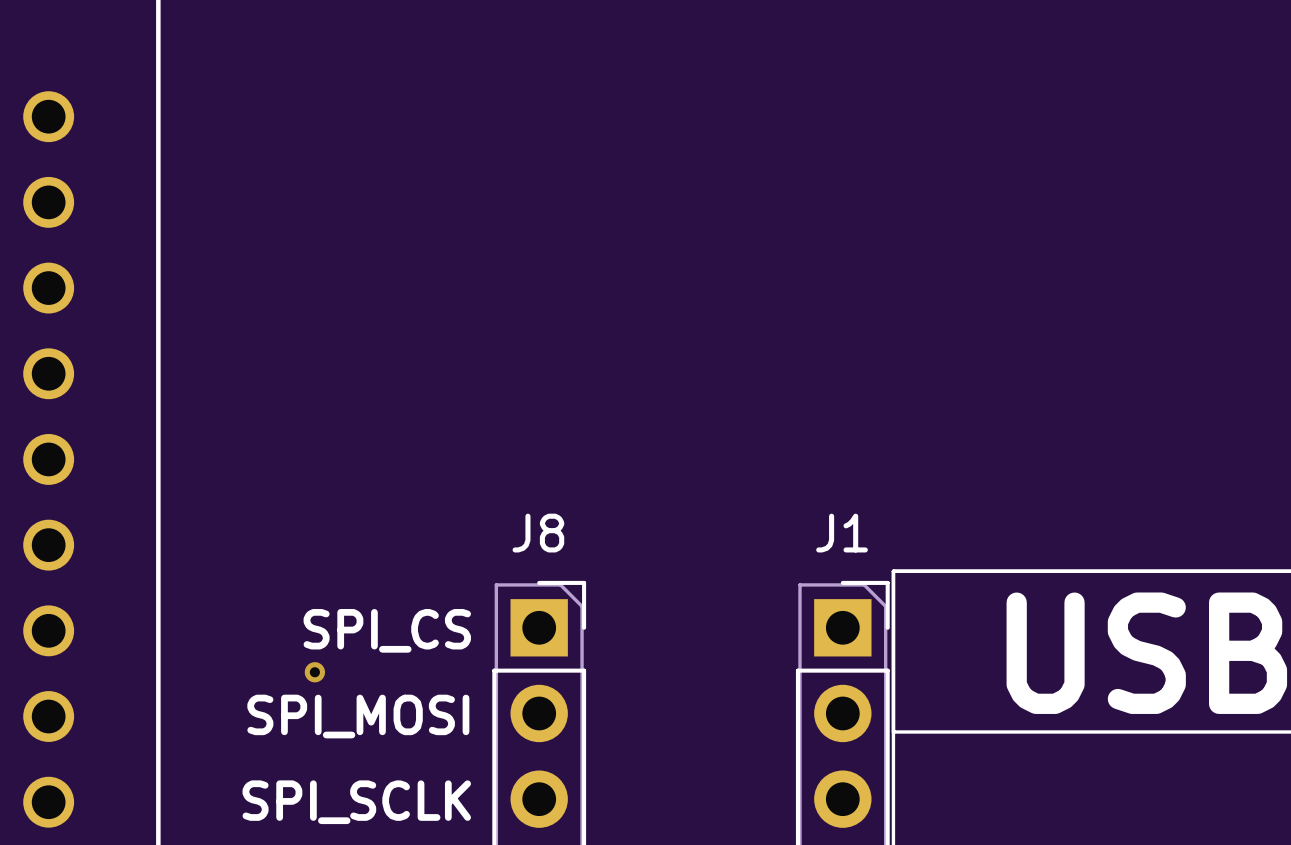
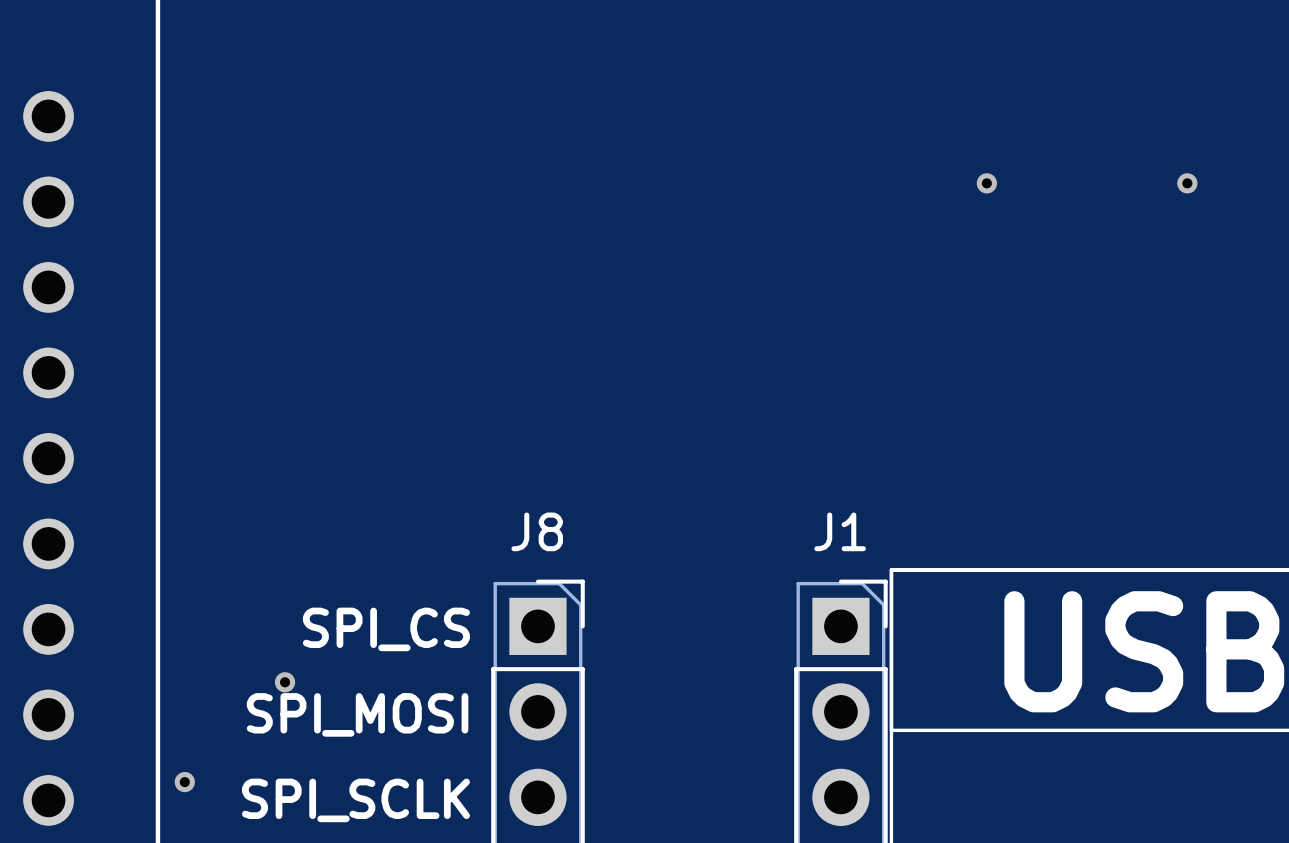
via: none -> (986, 183)
via: none -> (1187, 183)
via position: (314, 672) -> (285, 682)
via: none -> (184, 782)

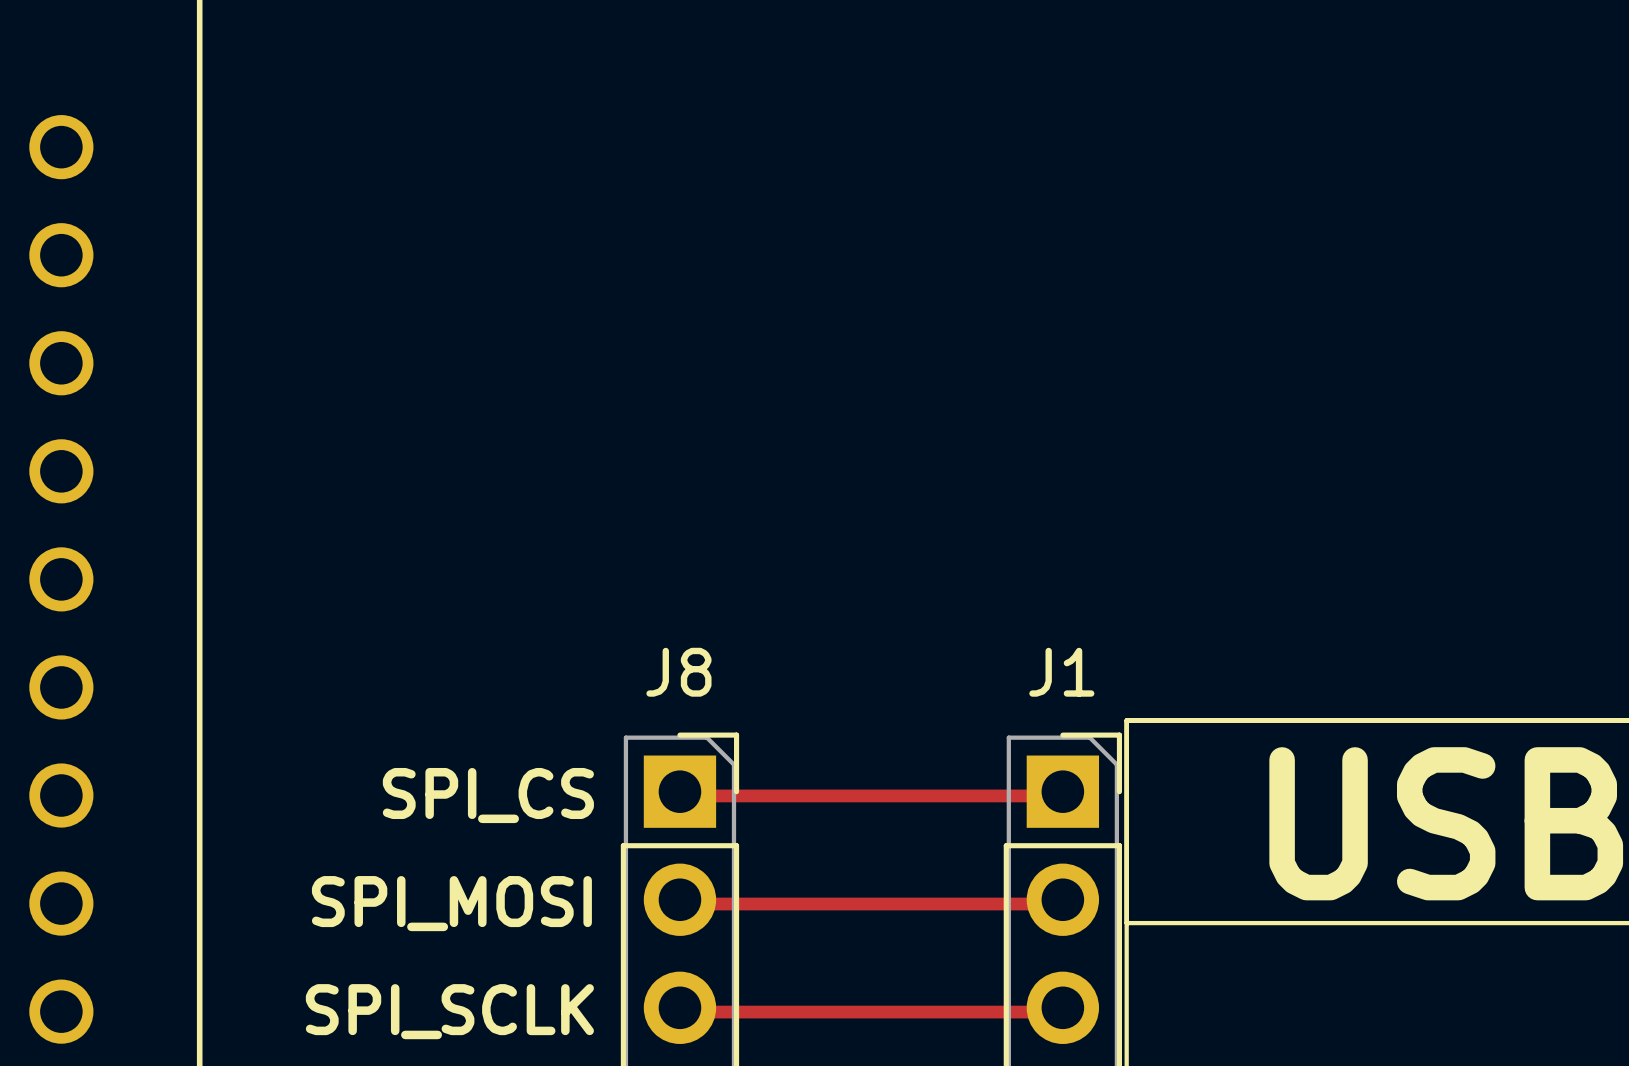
via: (986, 183) -> none
via: (1187, 183) -> none
track: none -> (682, 795) (1064, 795)
via: (285, 682) -> none
track: none -> (682, 904) (1064, 904)
via: (184, 782) -> none
track: none -> (682, 1012) (1064, 1012)

